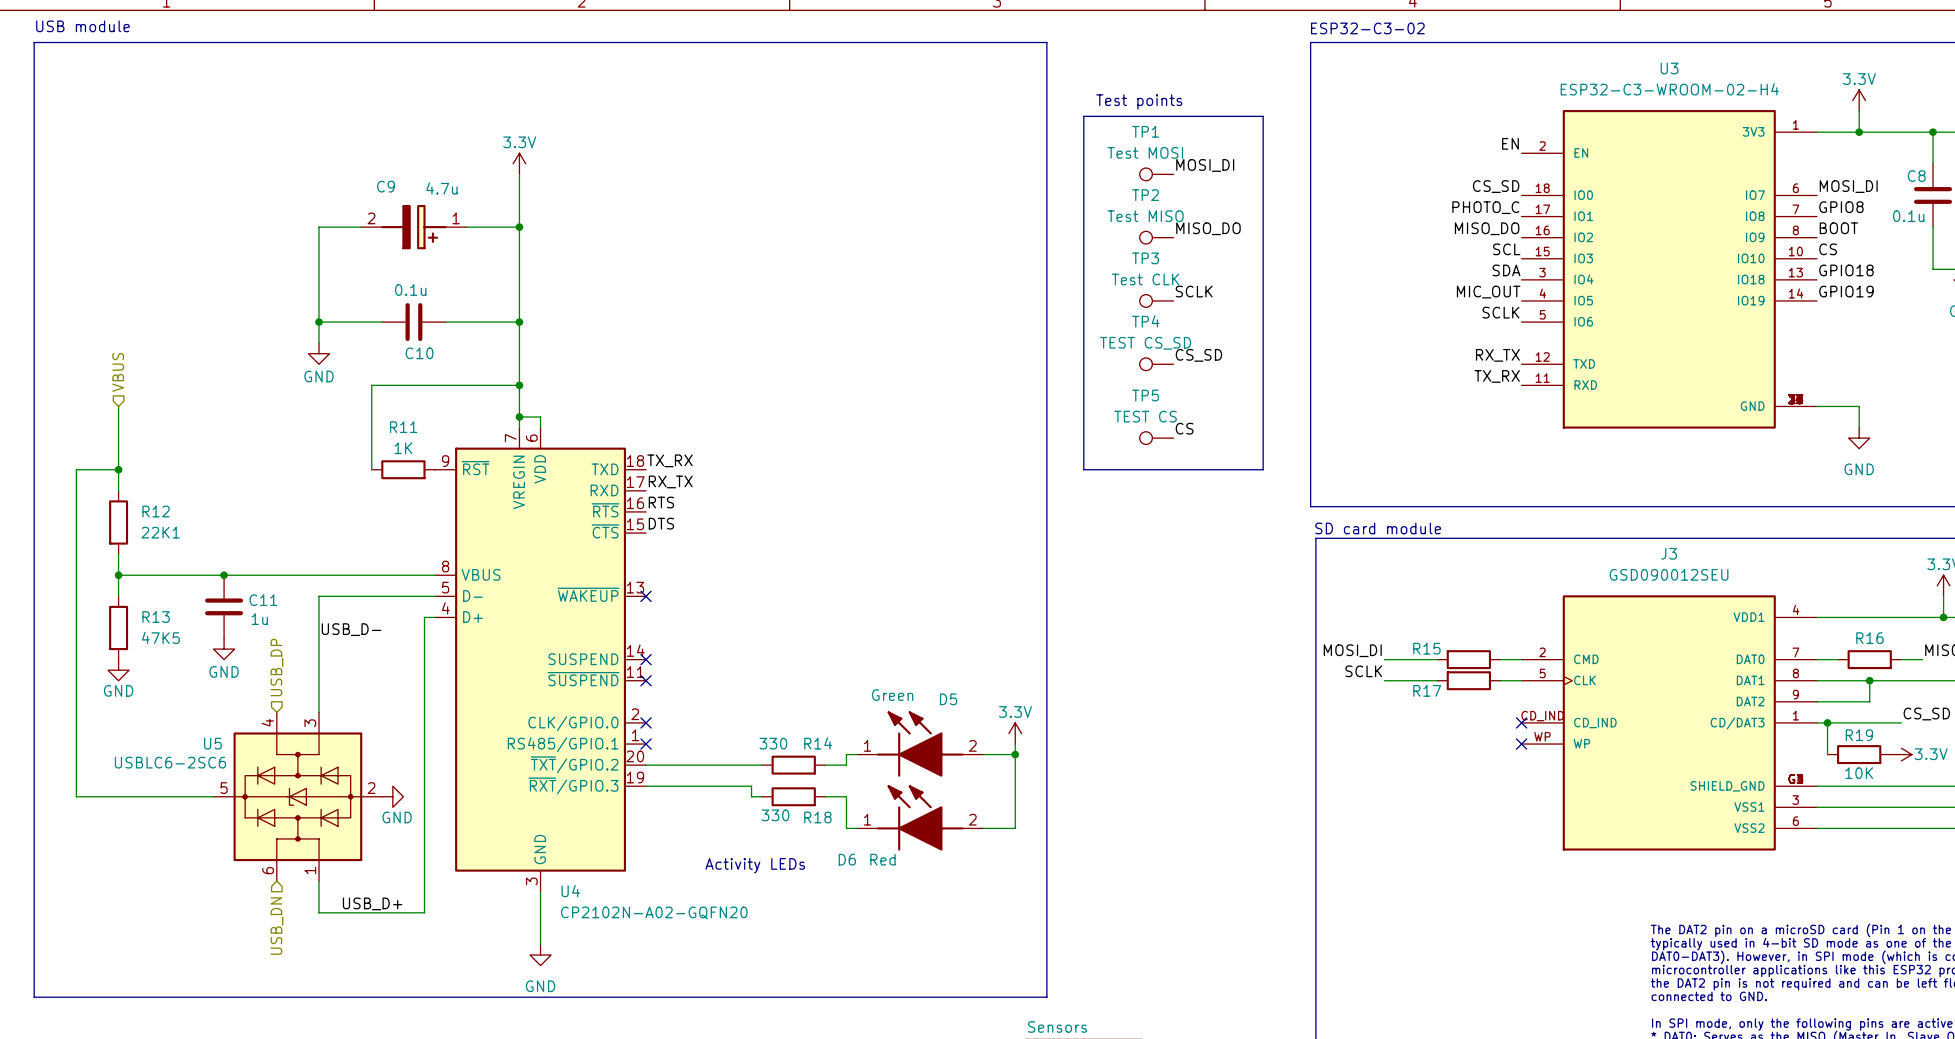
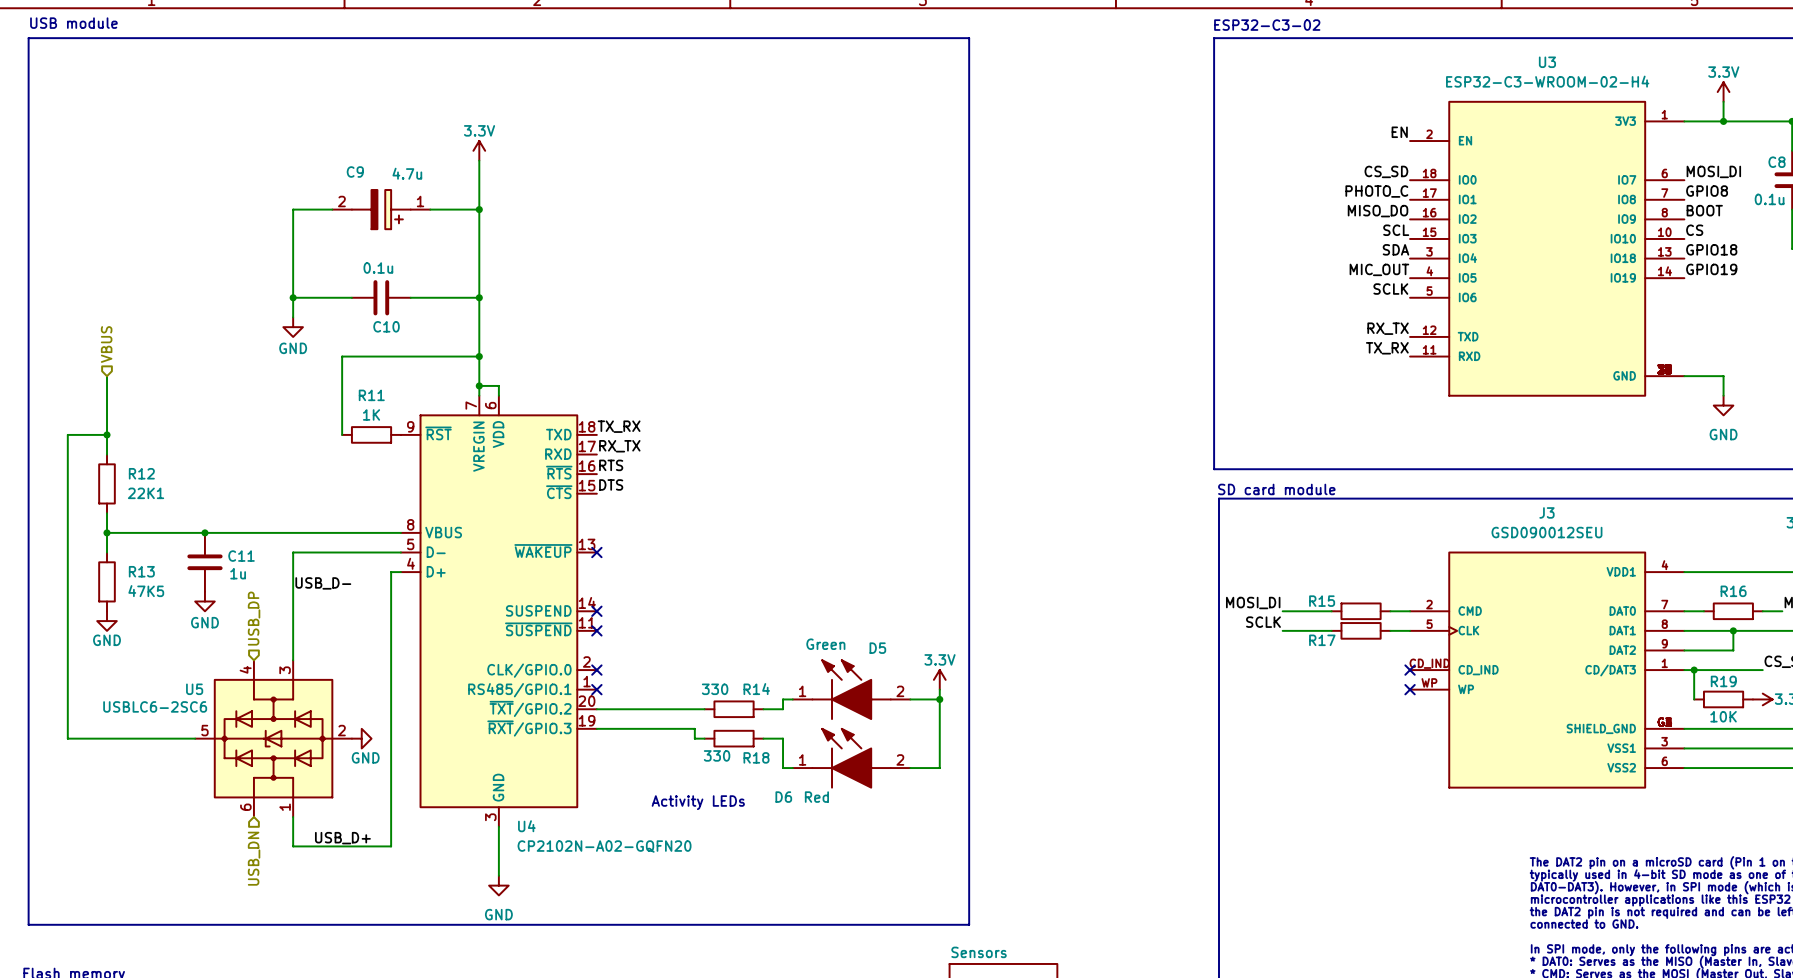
text: Test points (1139, 101) -> none
line: (1083, 116) (1263, 116) (1263, 469) (1083, 469) (1083, 116) -> none
label: MOSI_DI (1205, 165) -> none
TP1: Test MOSI (1156, 174) -> none
label: MISO_DO (1208, 228) -> none
TP2: Test MISO (1156, 237) -> none
label: SCLK (1194, 291) -> none
TP3: Test CLK (1156, 300) -> none
label: CS_SD (1198, 355) -> none
TP4: TEST CS_SD (1156, 364) -> none
label: CS (1184, 428) -> none
TP5: TEST CS (1156, 438) -> none

